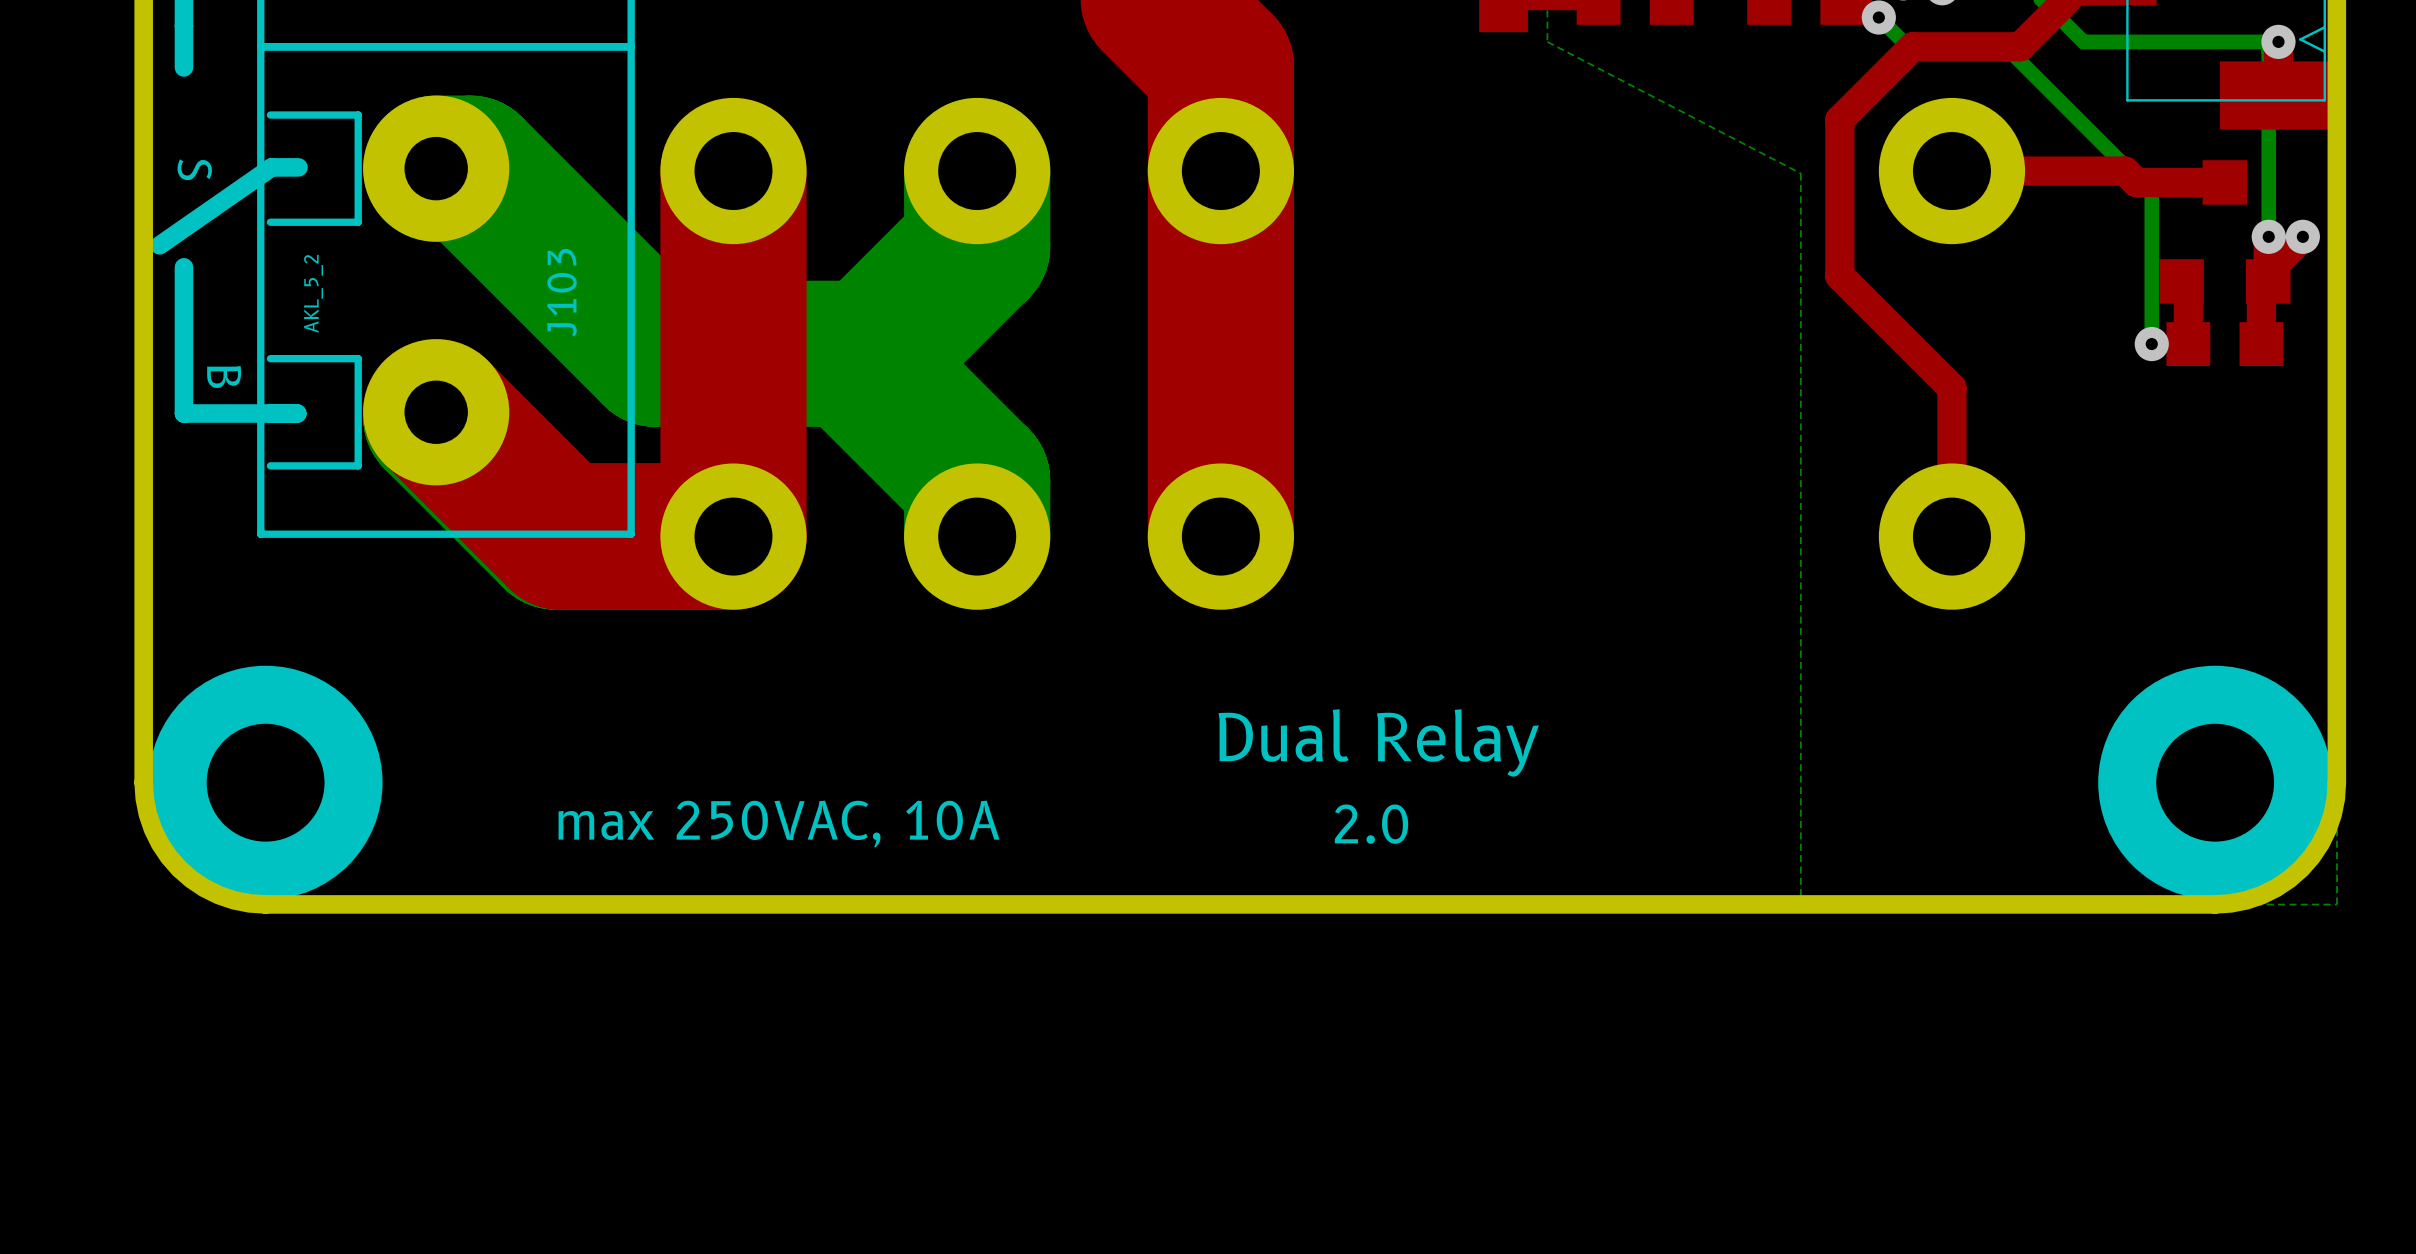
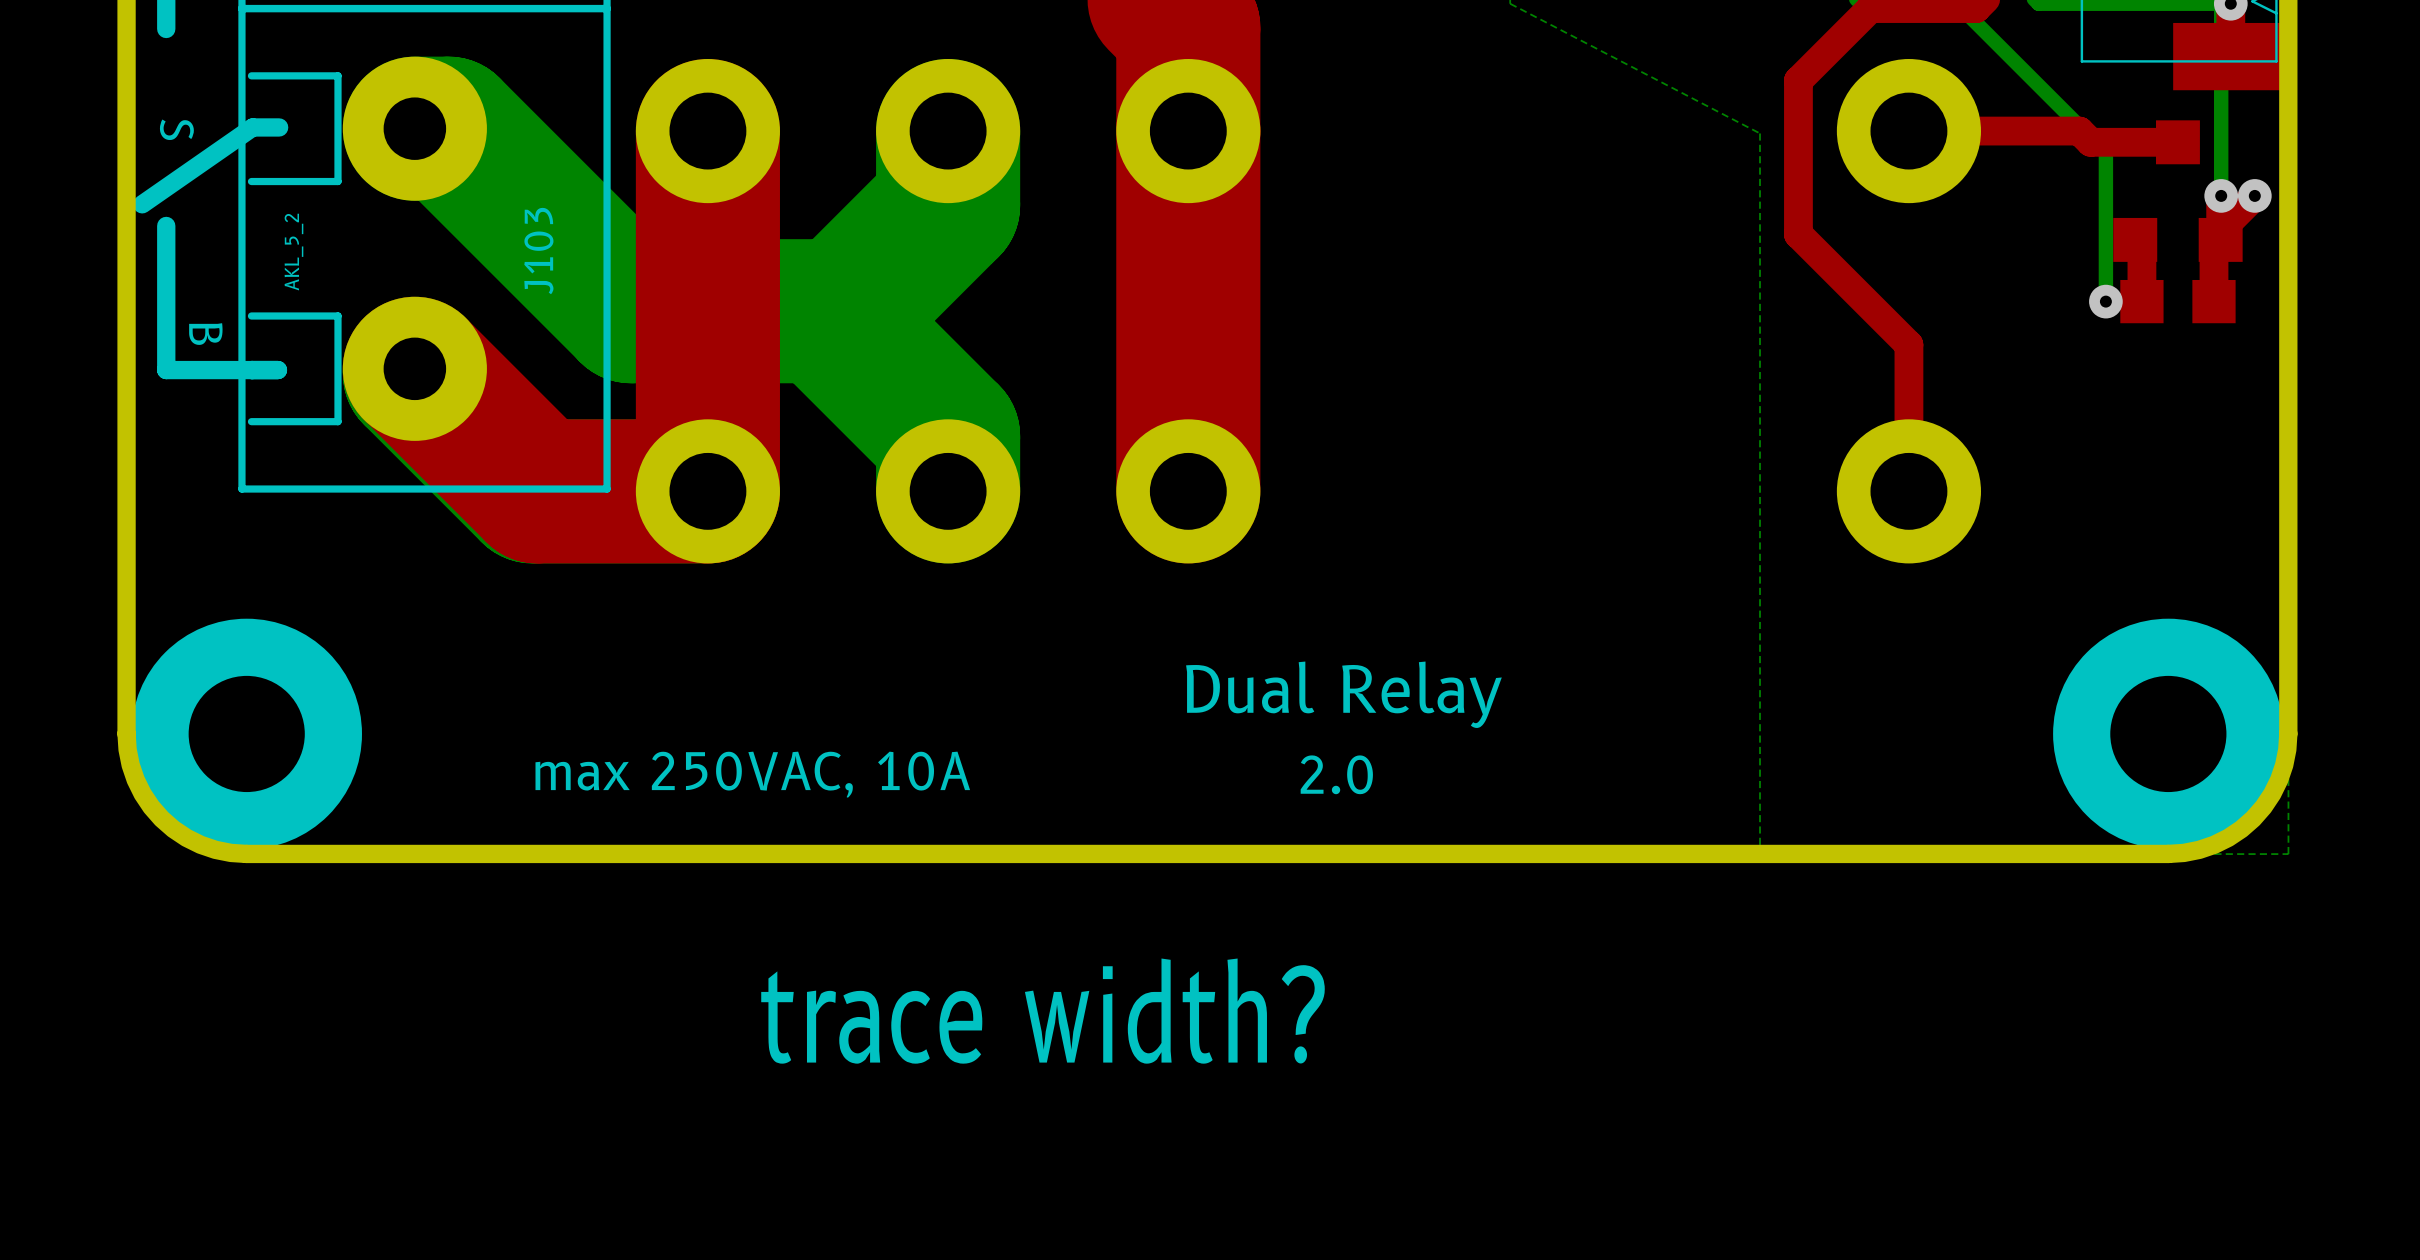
text: none -> trace width? (1042, 1011)

